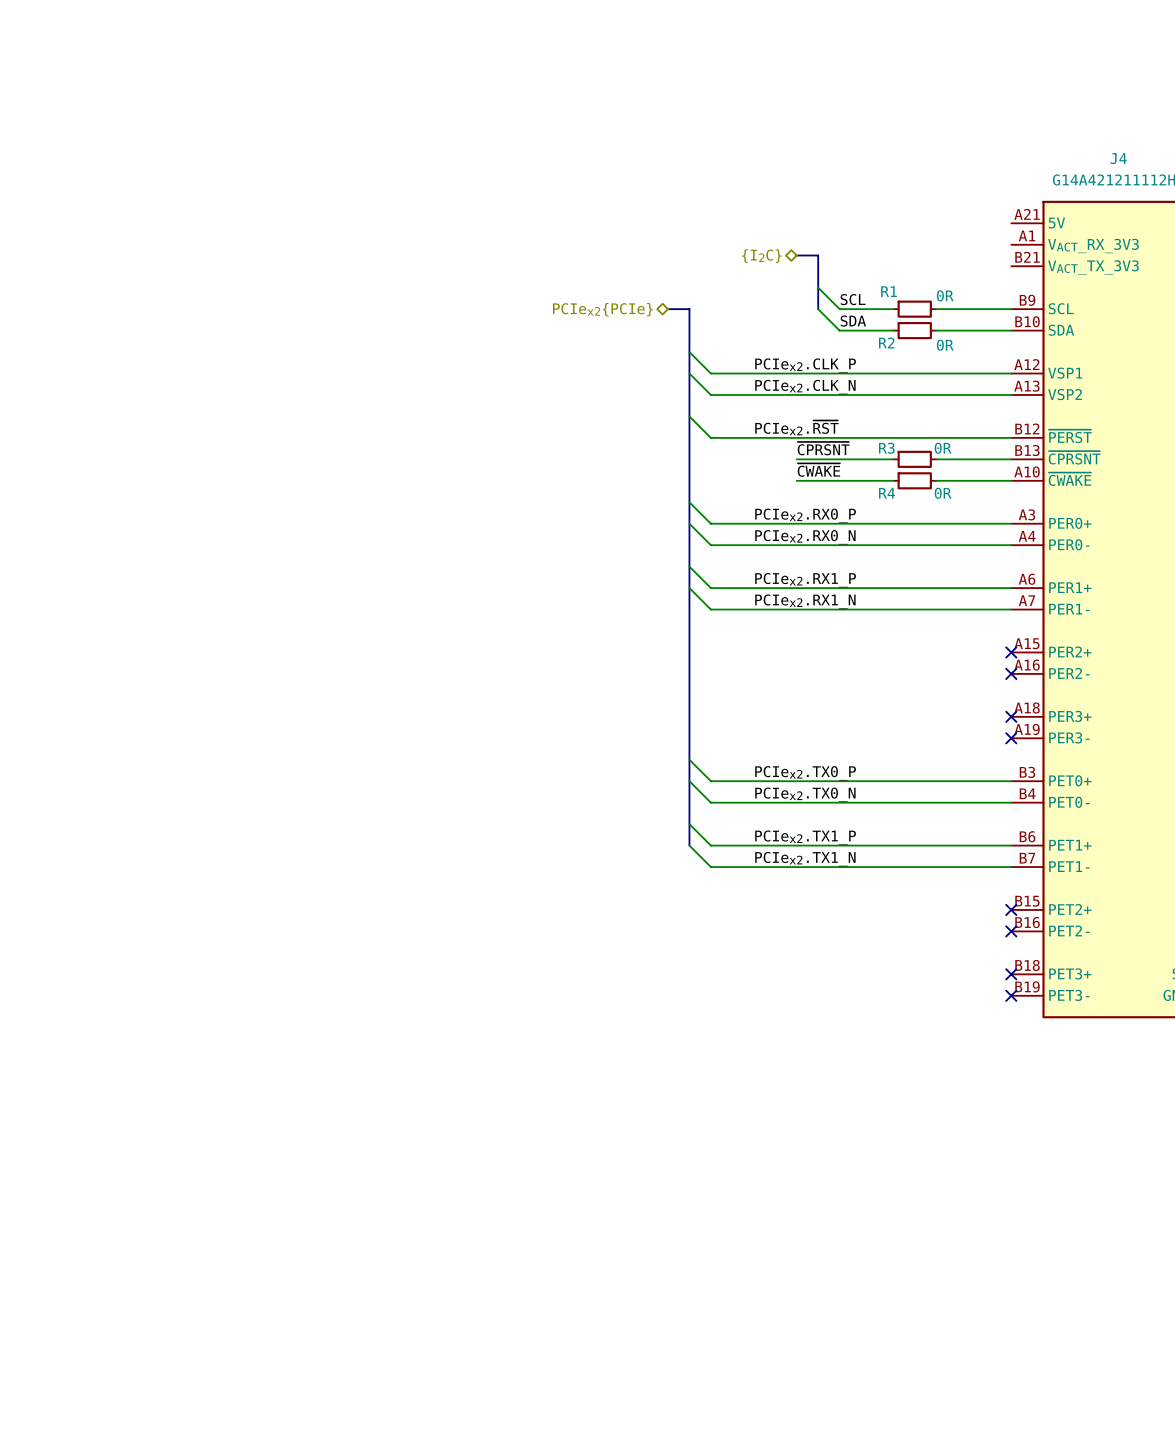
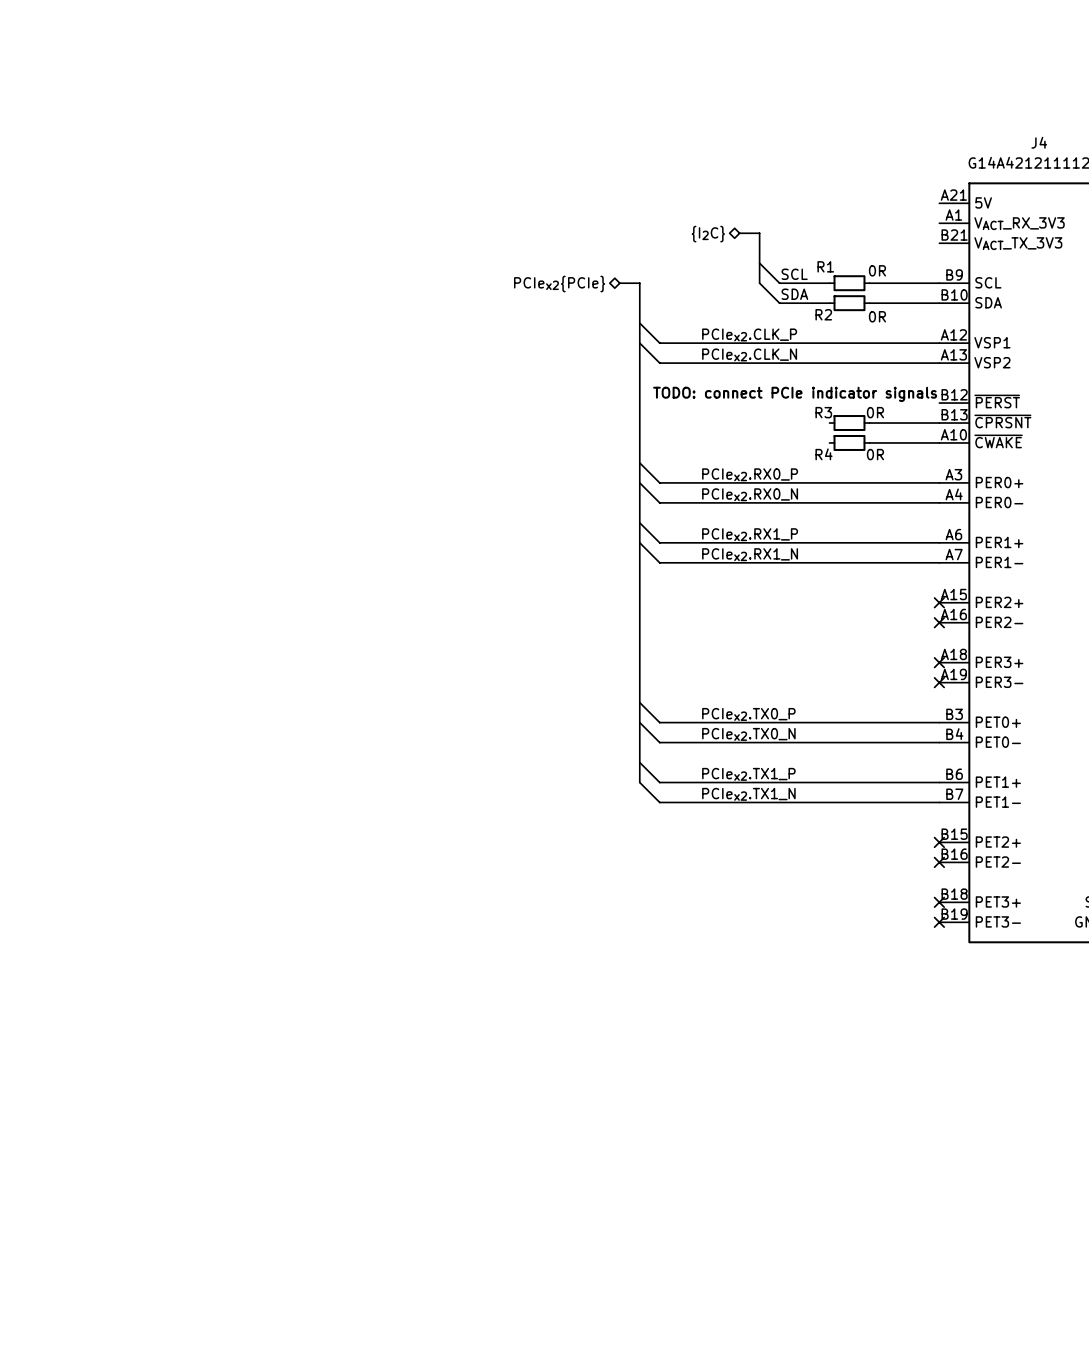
wire: (689, 416) (710, 437) (1011, 437) -> none
label: PCIex2.~{RST} (796, 427) -> none
text: none -> TODO: connect PCIe indicator signals (795, 394)
label: ~{CPRSNT} (823, 448) -> none
wire: (796, 459) (893, 459) -> none
label: ~{CWAKE} (818, 470) -> none
wire: (796, 480) (893, 480) -> none

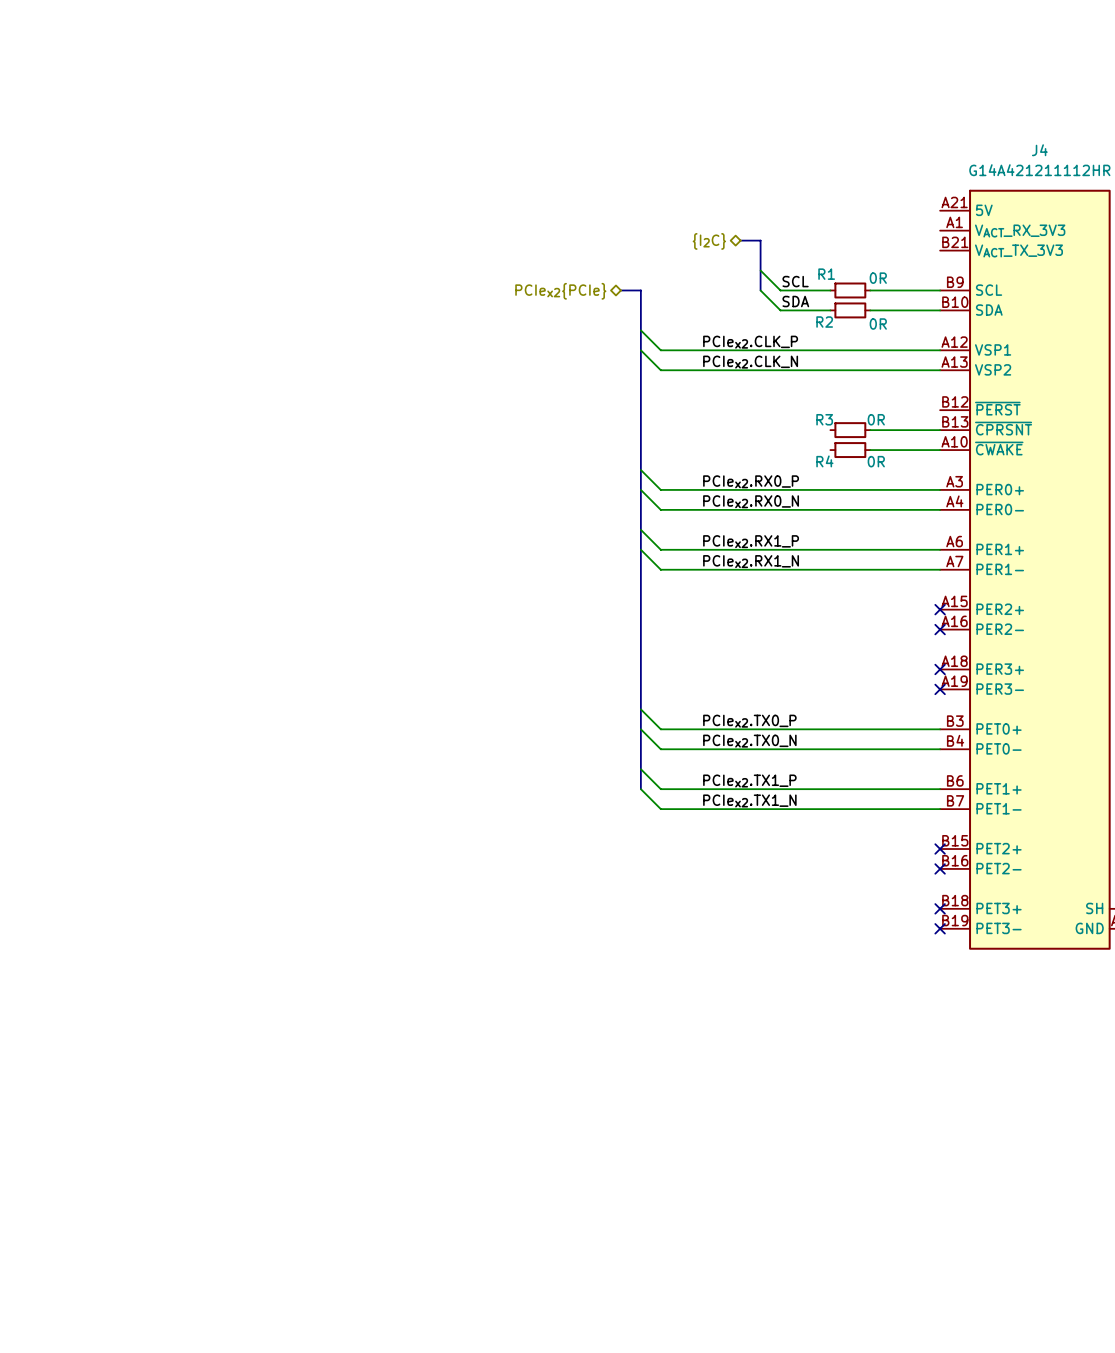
text: TODO: connect PCIe indicator signals (795, 394) -> none

